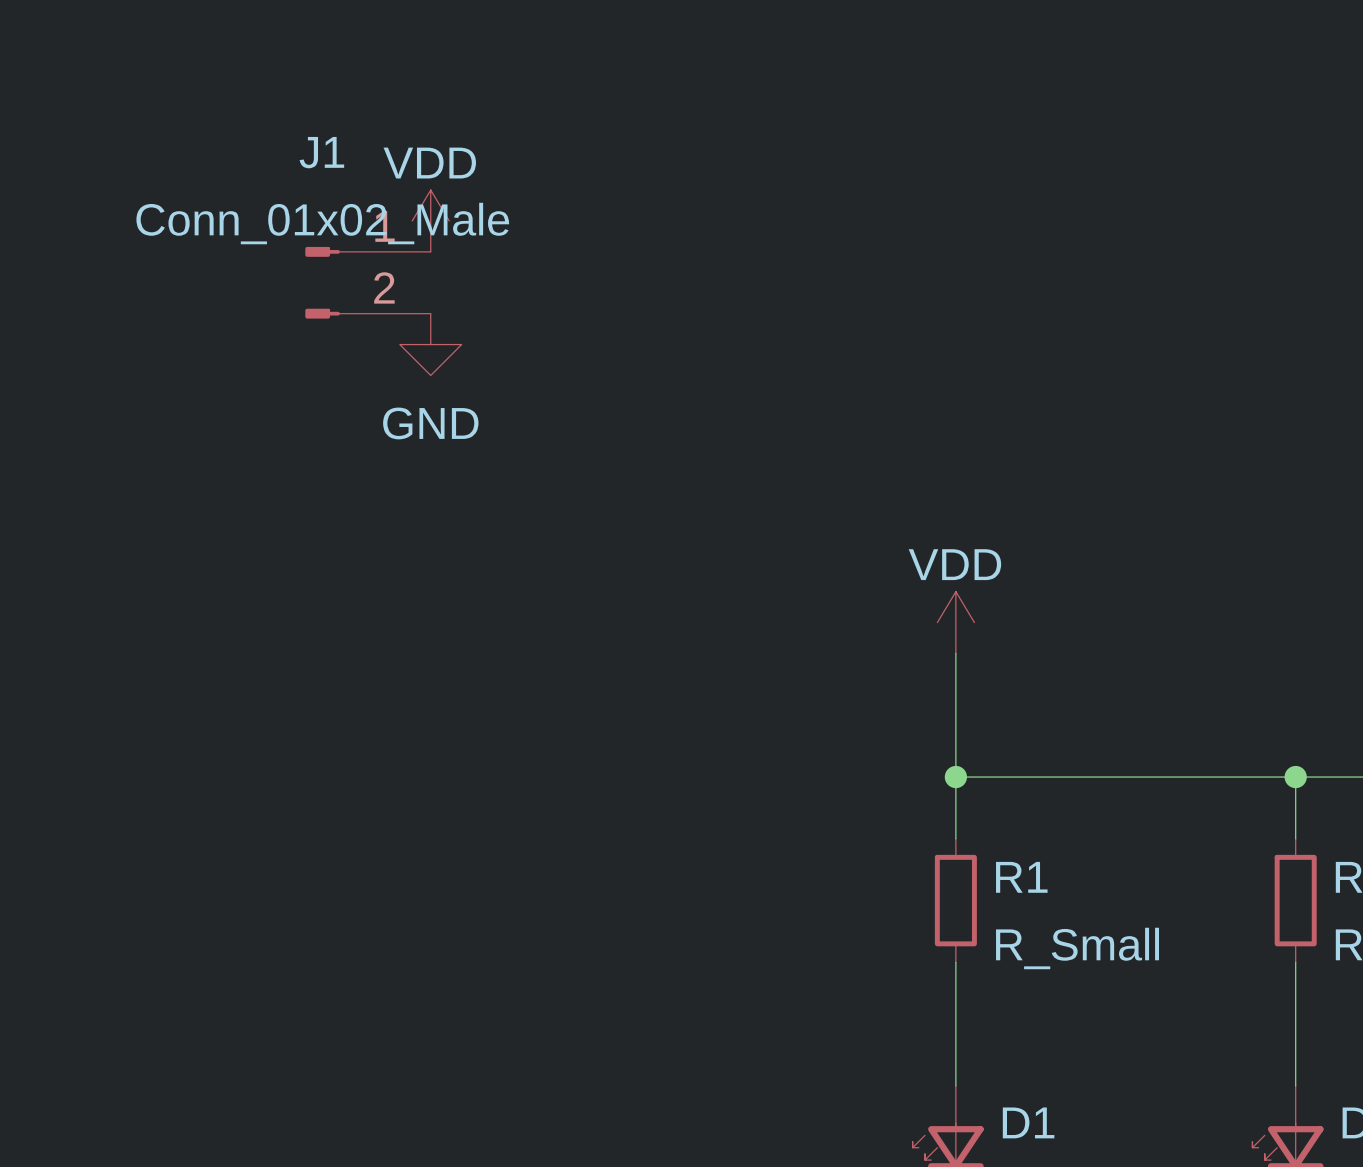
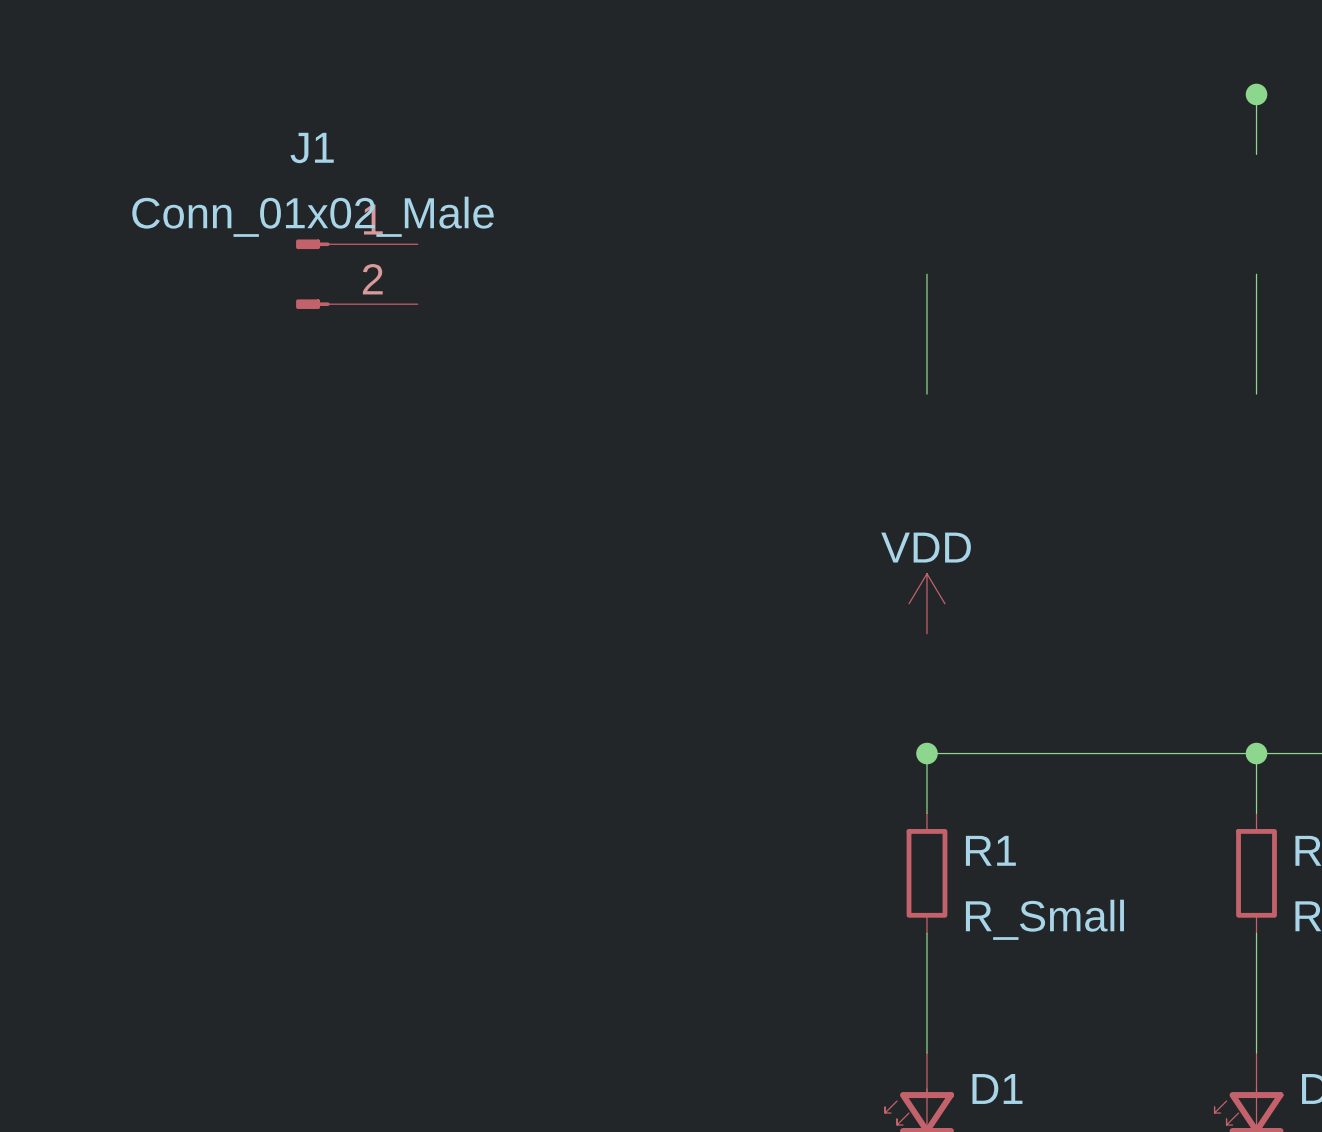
wire: none -> (1256, 94) (1256, 154)
junction: none -> (1256, 94)
power symbol: VDD (430, 220) -> none
wire: none -> (1256, 274) (1256, 394)
power symbol: GND (430, 344) -> none
wire: (955, 653) (955, 777) -> (926, 274) (926, 394)

